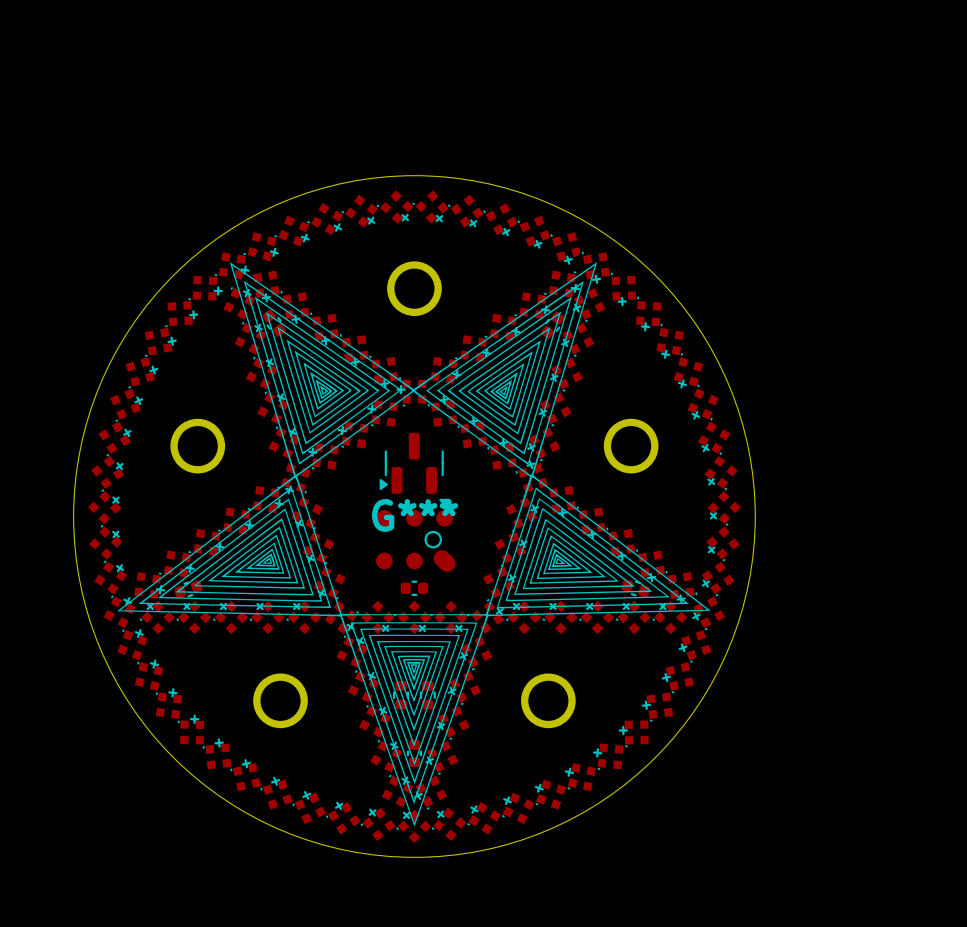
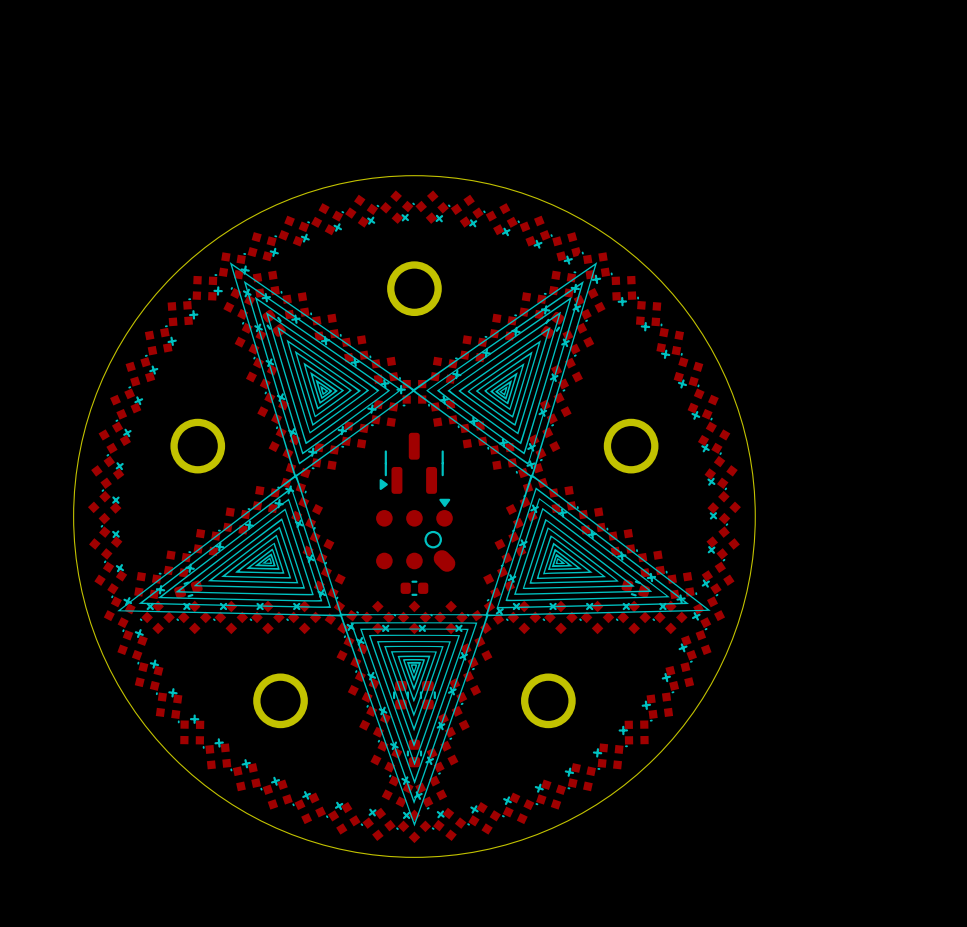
G***: (413, 544) -> none

